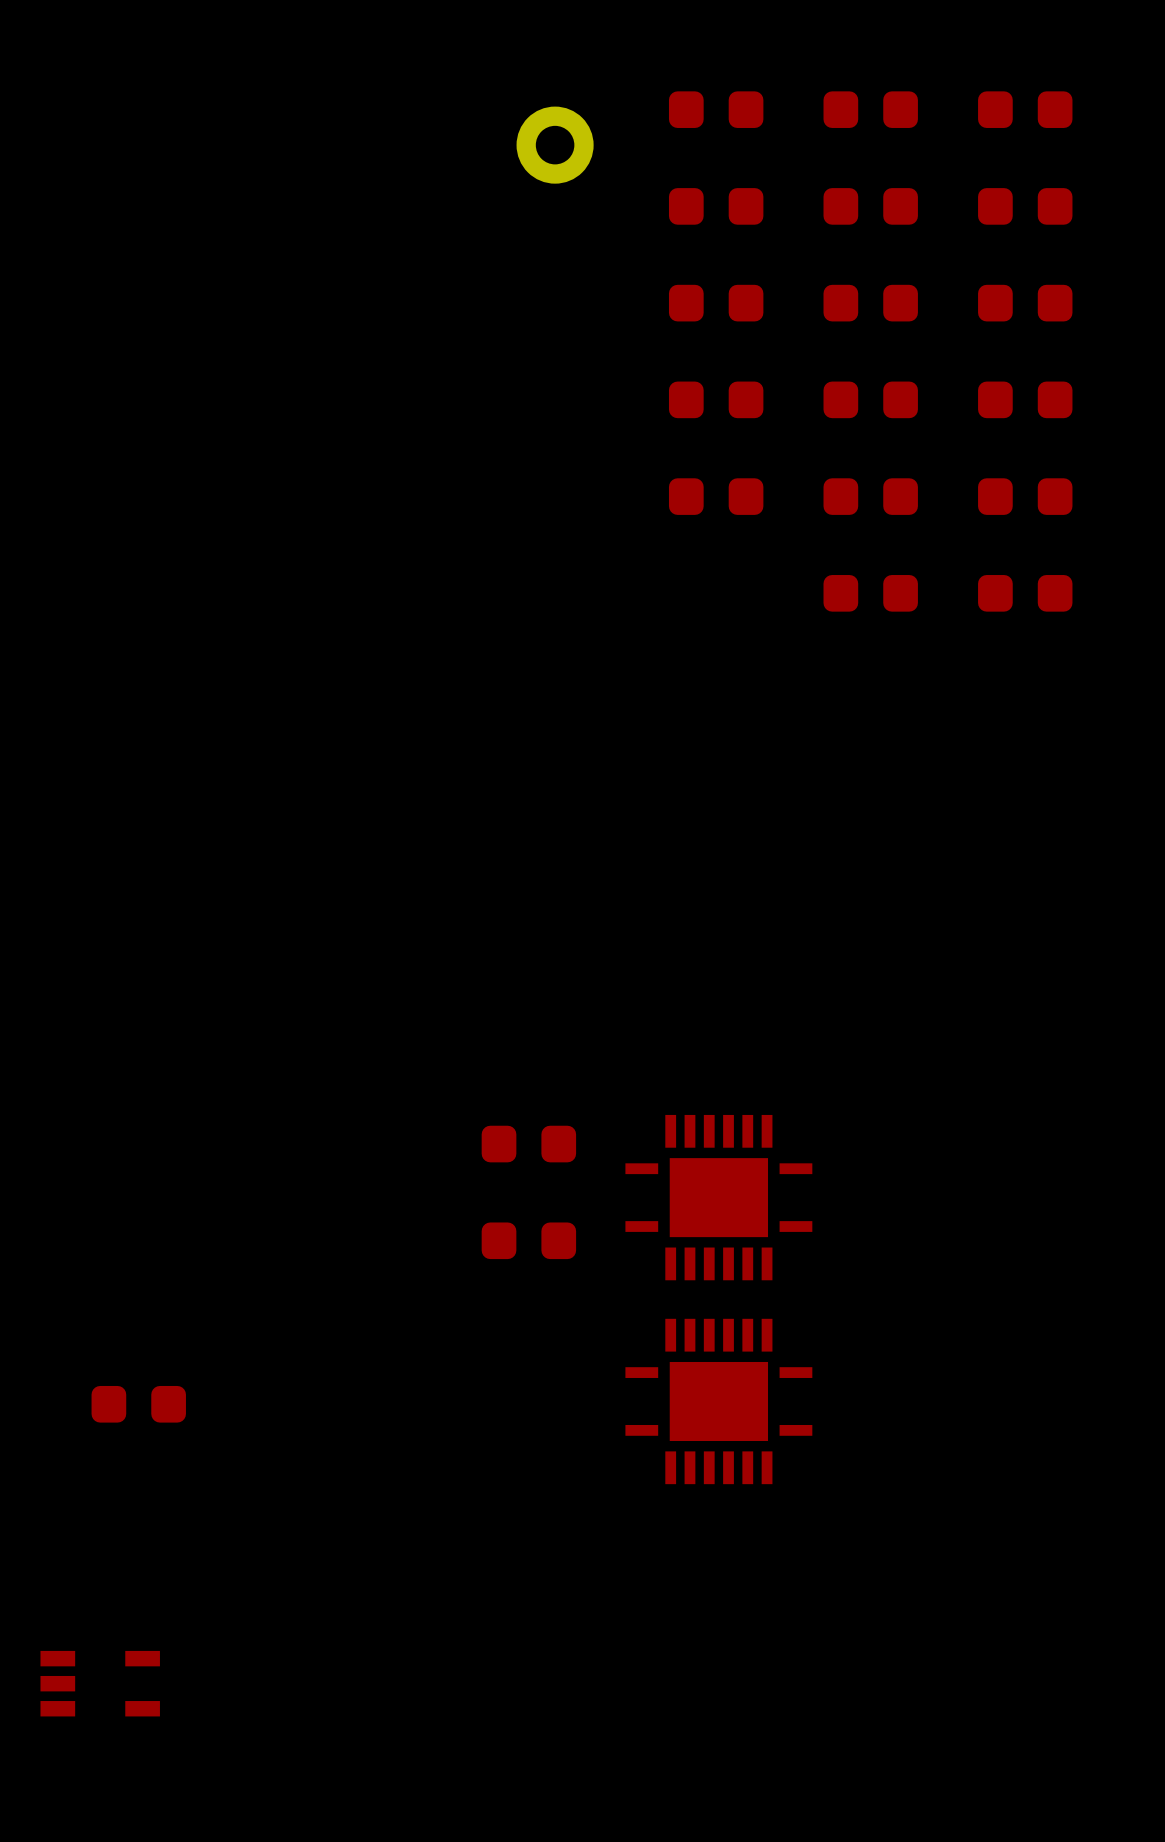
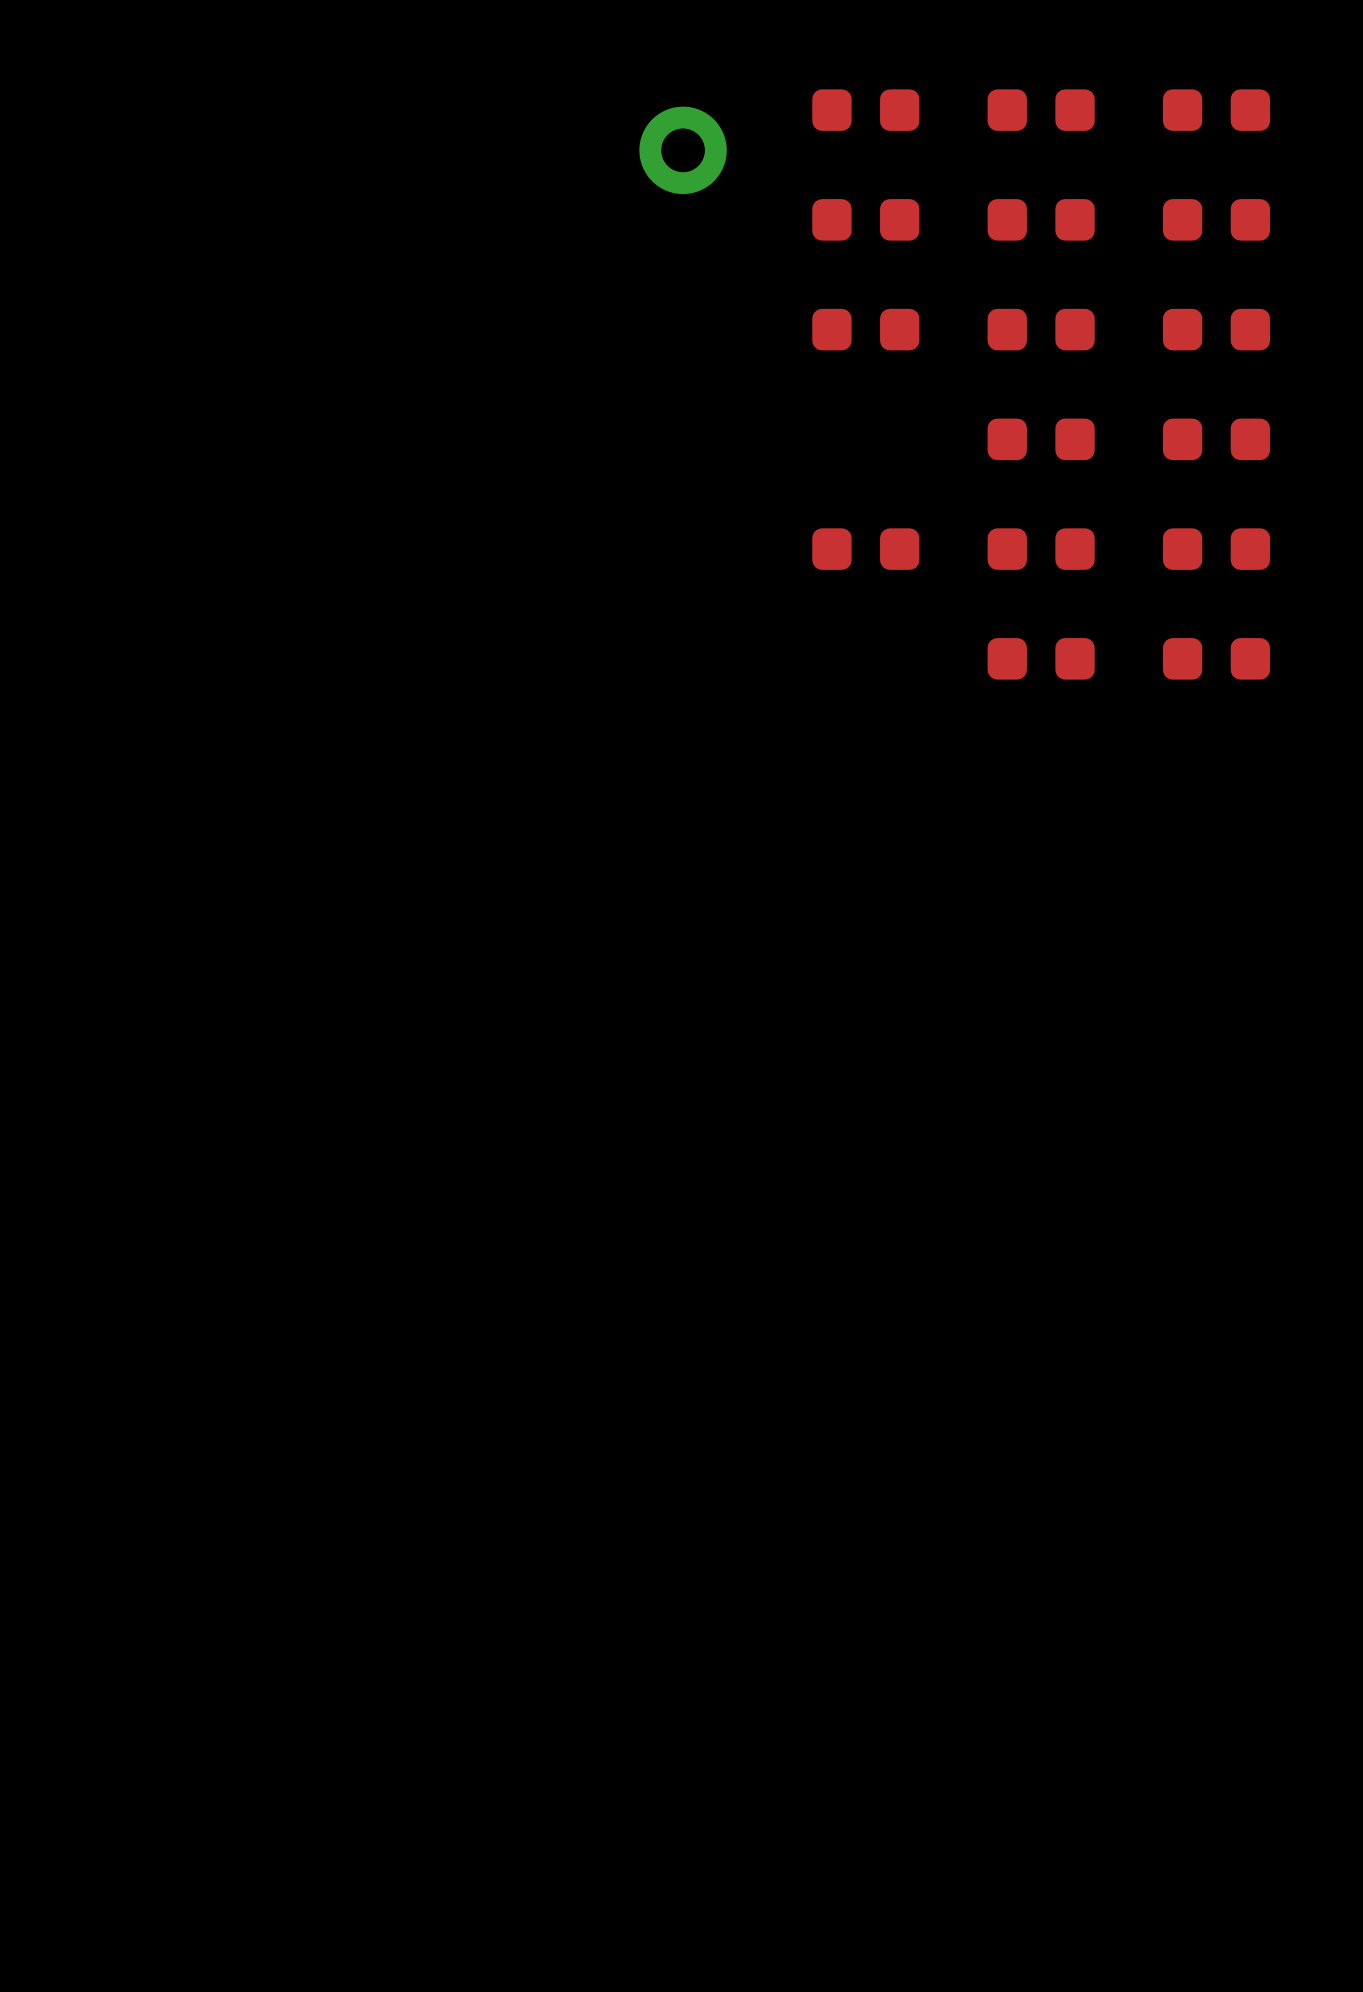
part: (716, 399) -> none
part: (528, 1144) -> none
part: (718, 1197) -> none
part: (528, 1240) -> none
part: (718, 1401) -> none
part: (138, 1404) -> none
part: (100, 1683) -> none

